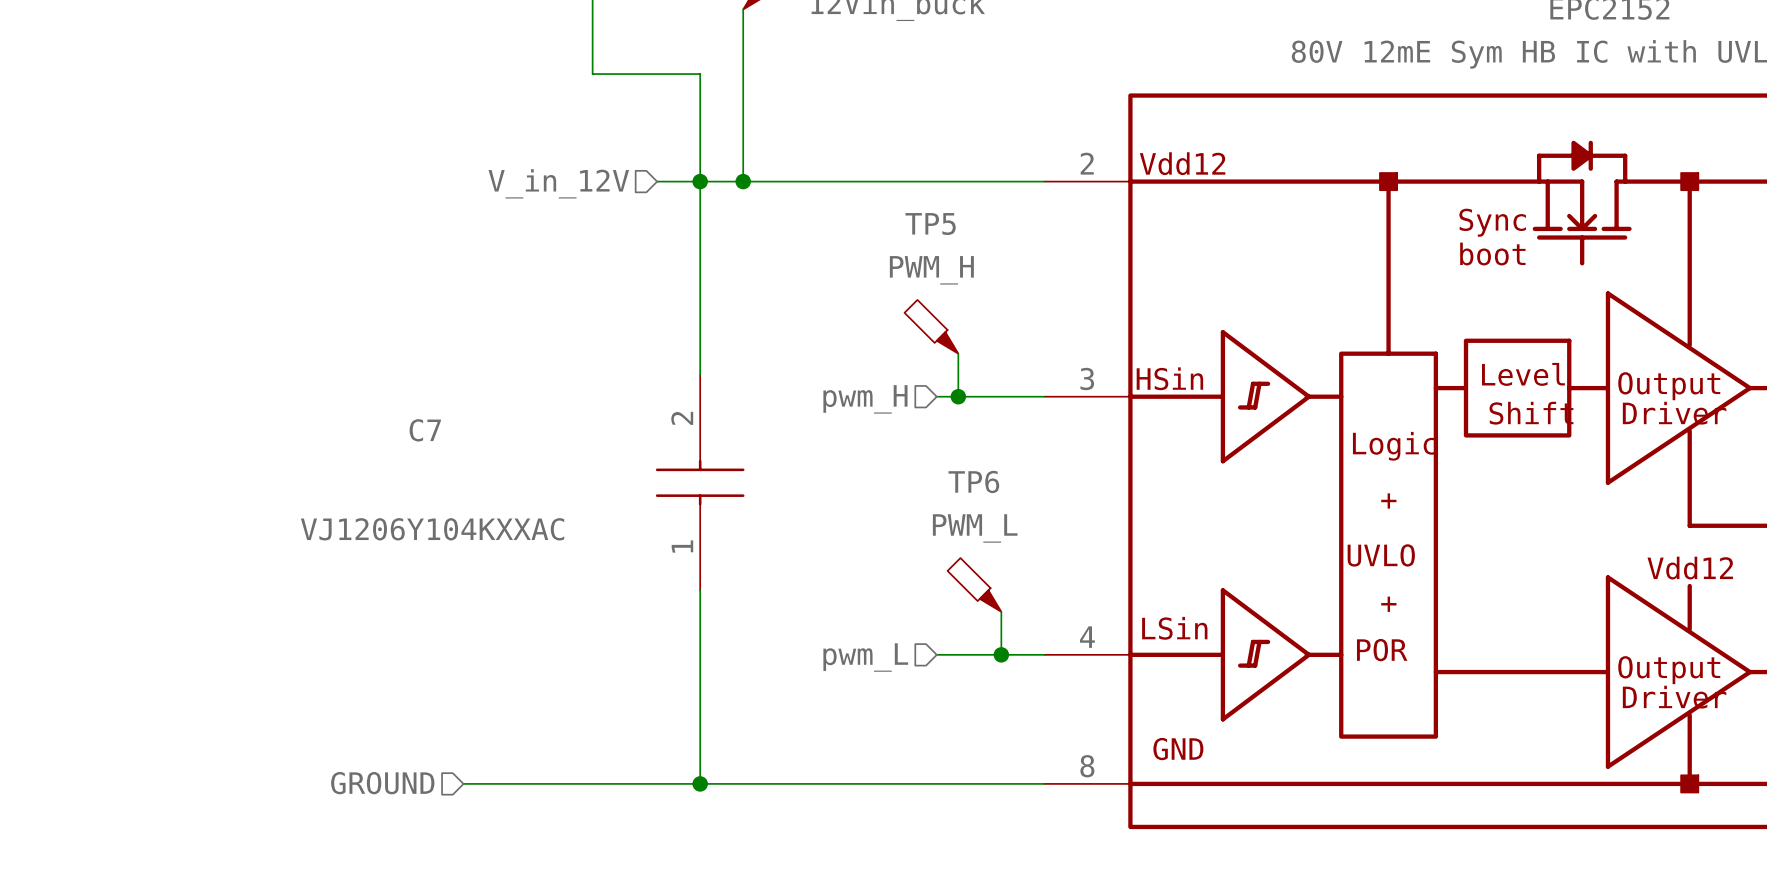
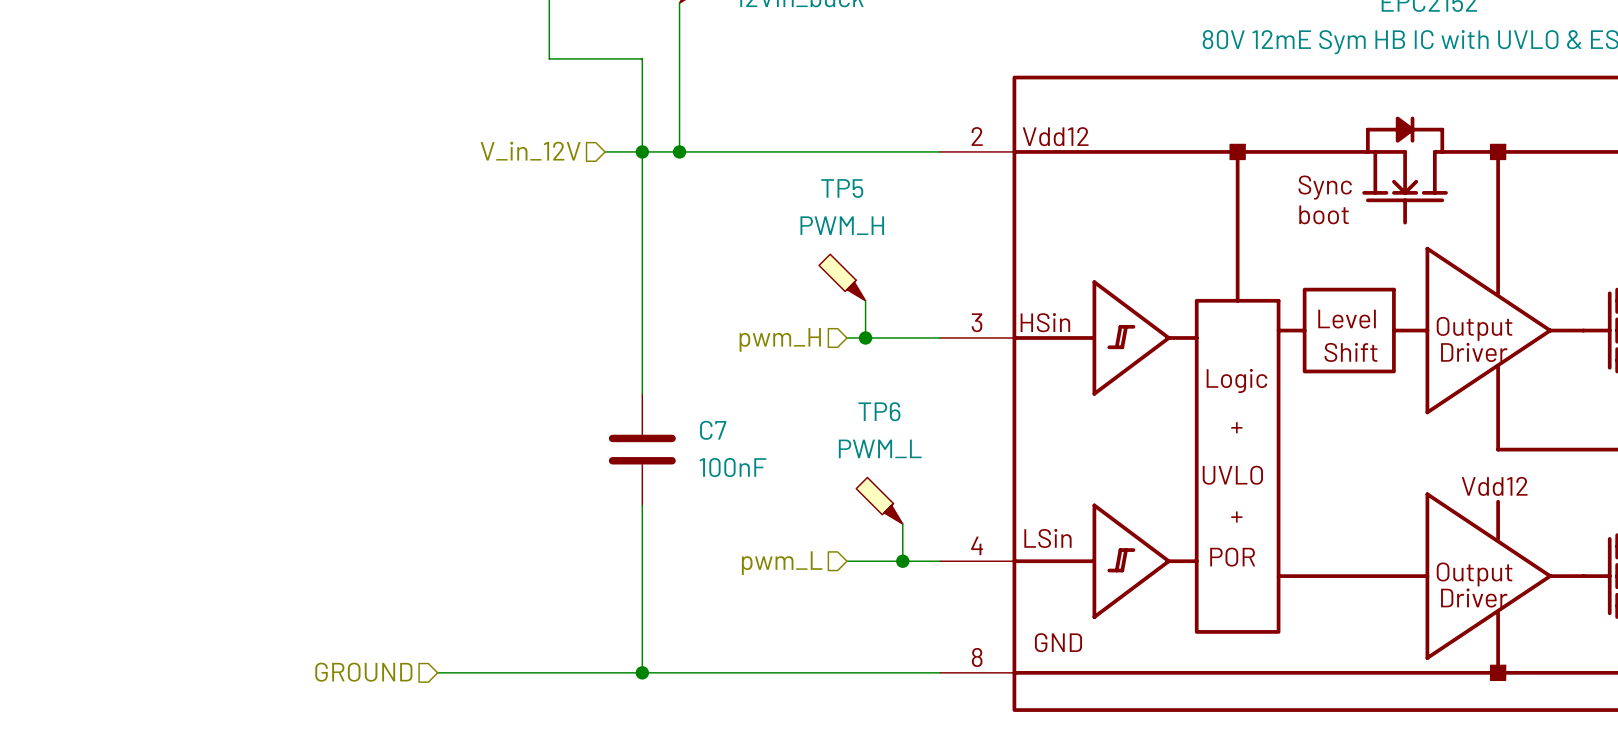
C7 symbol: [655, 375, 745, 591] -> [608, 393, 676, 506]
C7 name position: C7 (425, 430) -> C7 (713, 430)
C7 value: VJ1206Y104KXXAC (432, 529) -> 100nF (732, 467)

